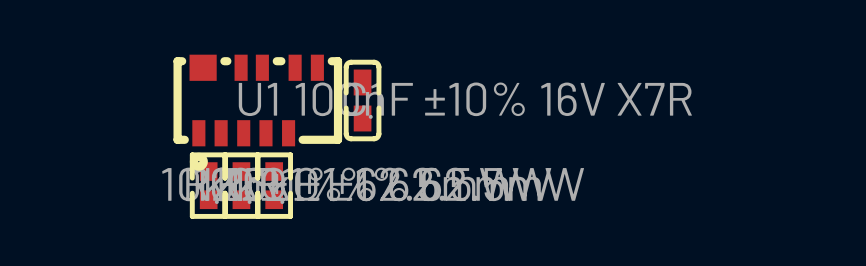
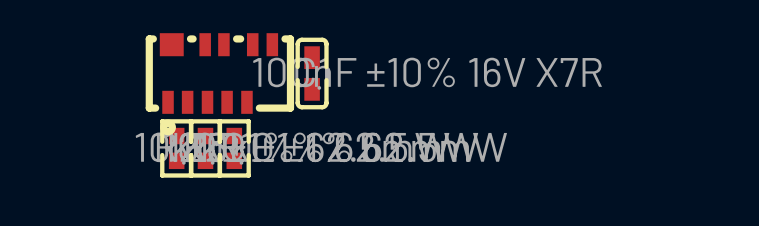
U1 name: U1 (257, 99) -> none

